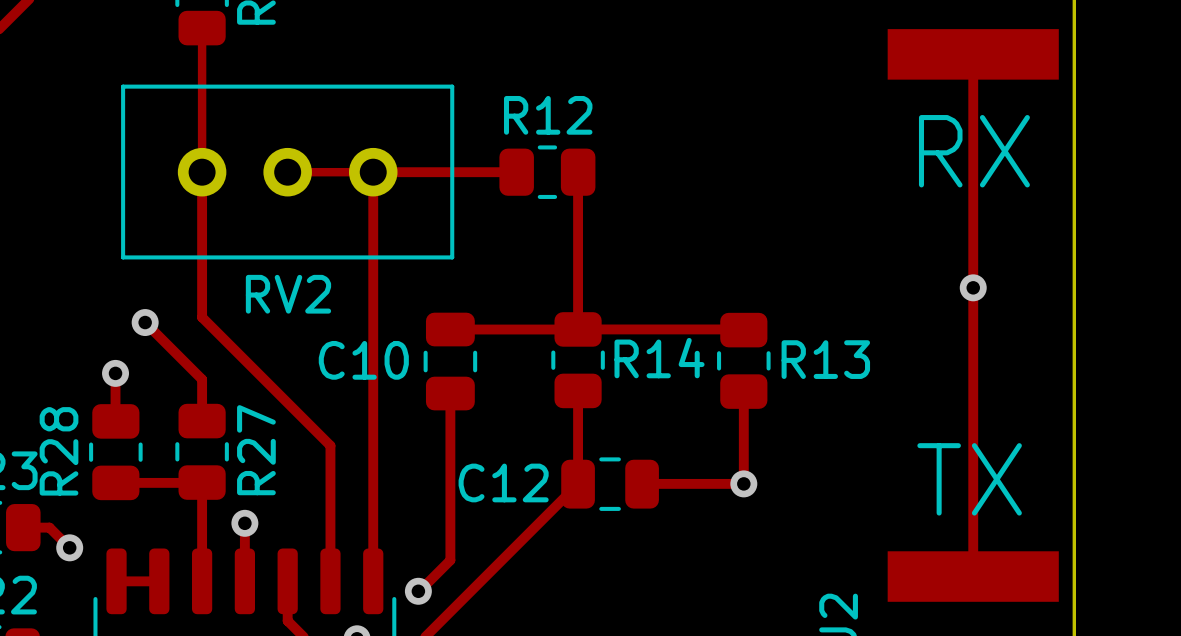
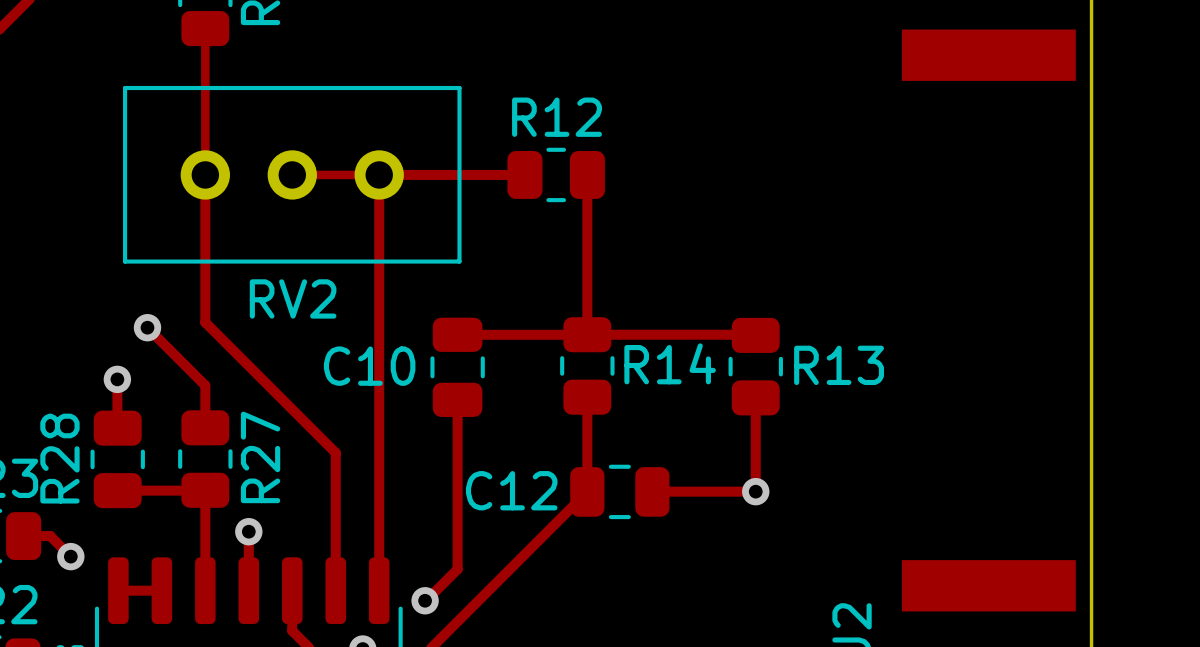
track: (973, 54) (973, 576) -> none
text: RX (974, 151) -> none
via: (973, 287) -> none
text: TX (969, 479) -> none

